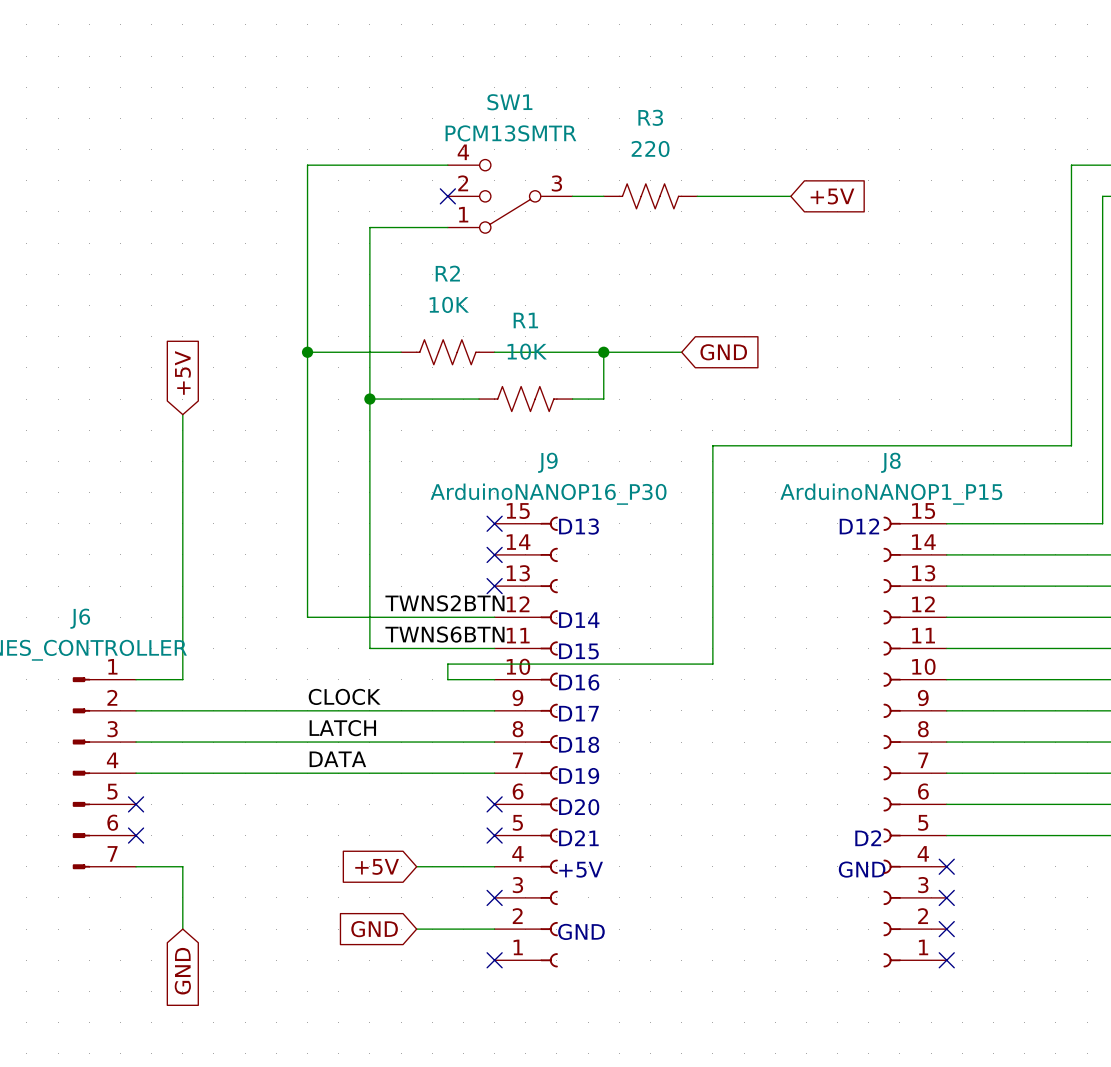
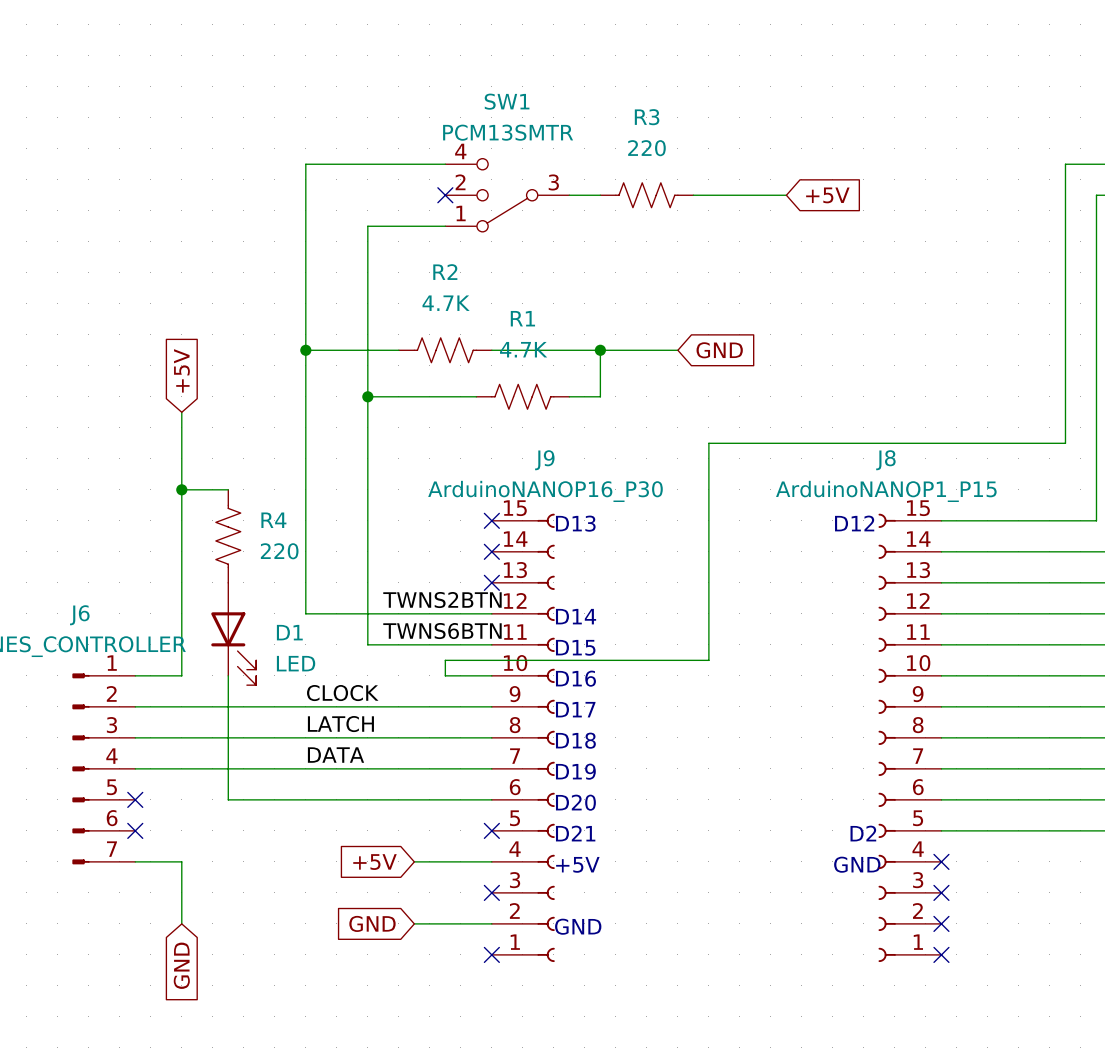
R2 value: 10K (449, 304) -> 4.7K (446, 303)
R1 value: 10K (527, 351) -> 4.7K (523, 349)
wire: none -> (181, 489) (228, 489)
junction: none -> (181, 489)
R4: none -> 220 (228, 536)
D1: none -> LED (233, 634)
wire: none -> (228, 675) (228, 799) (491, 799)
no-connect mark: (494, 804) -> none

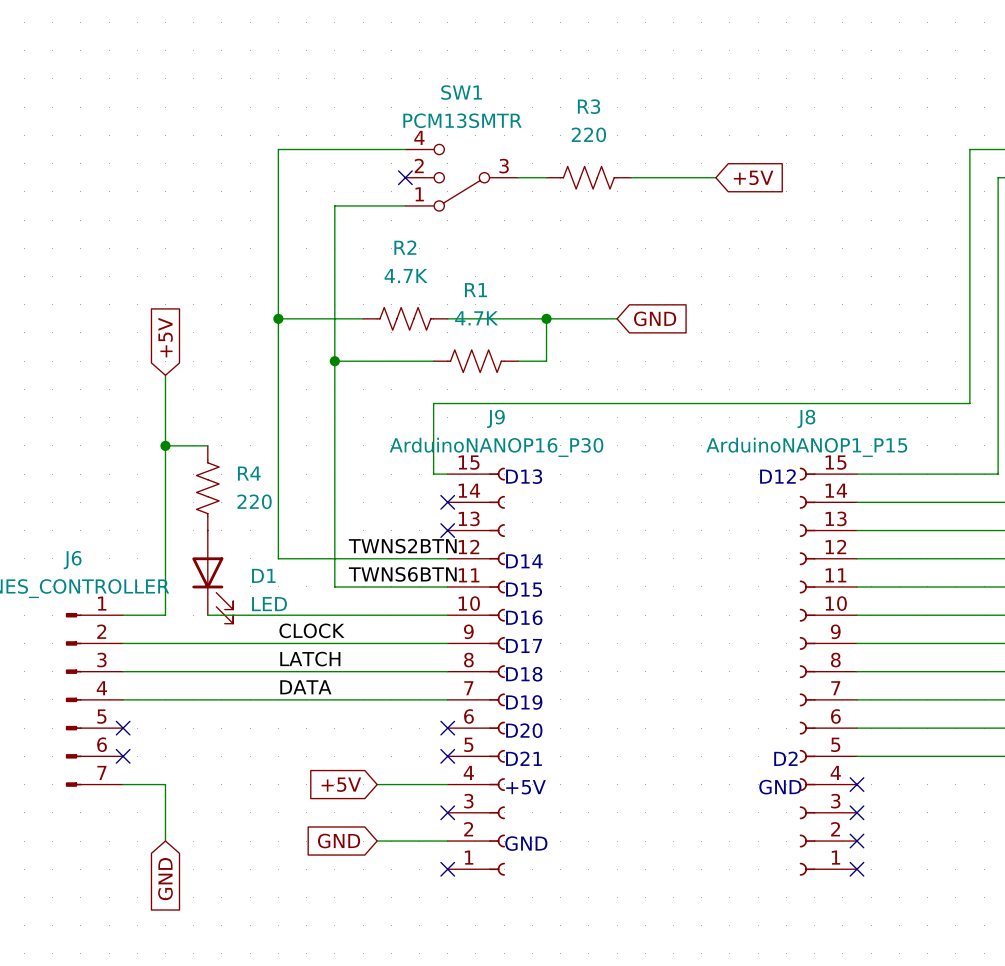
wire: (708, 443) (708, 660) (445, 660) (445, 675) -> (645, 403) (433, 403) (433, 474) (447, 474)
no-connect mark: (491, 520) -> none
wire: (228, 675) (228, 799) (491, 799) -> (207, 615) (405, 615)
no-connect mark: none -> (447, 728)

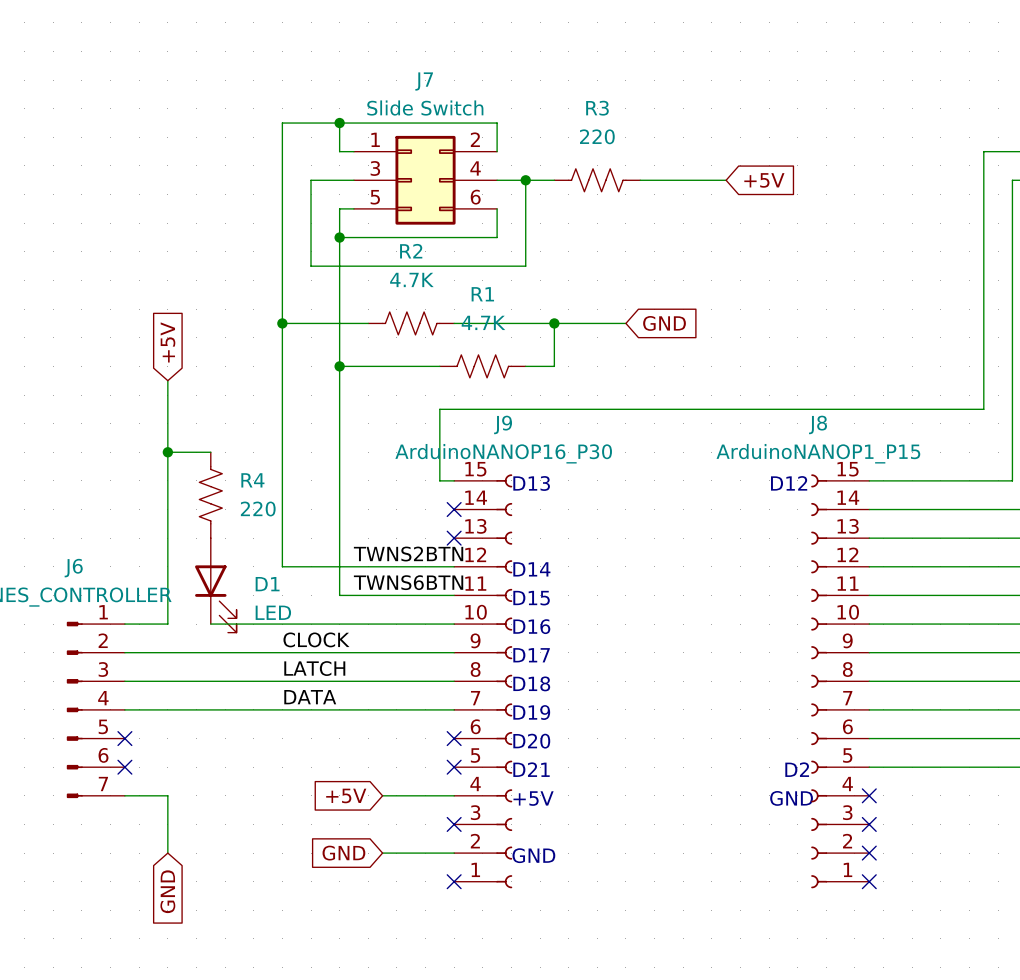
junction: none -> (339, 123)
wire: (278, 149) (334, 149) -> (339, 123) (339, 151)
wire: none -> (282, 151) (282, 123) (497, 123) (497, 151)
wire: none -> (353, 180) (311, 180) (311, 266) (525, 266) (525, 180) (497, 180)
no-connect mark: (405, 177) -> none
J7: none -> Slide Switch (425, 180)
SW1: PCM13SMTR (461, 177) -> none
junction: none -> (525, 180)
wire: none -> (497, 208) (497, 237) (339, 237)
junction: none -> (339, 237)

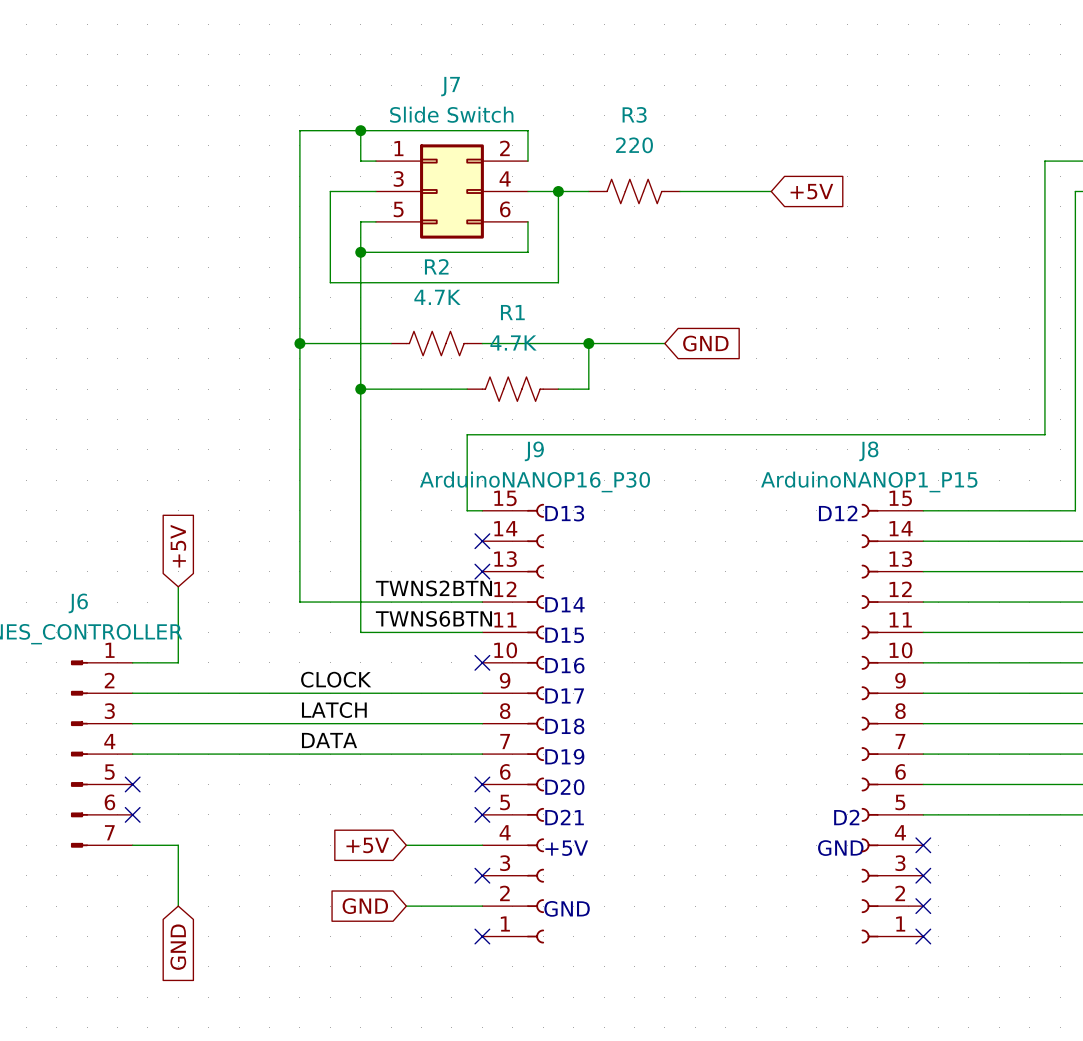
global label position: +5V (167, 342) -> +5V (178, 546)
wire: (167, 380) (167, 552) -> none
wire: (167, 452) (210, 452) -> none
junction: (167, 452) -> none
R4: 220 (210, 495) -> none
D1: LED (215, 585) -> none
wire: (210, 624) (454, 624) -> none
no-connect mark: none -> (482, 662)

